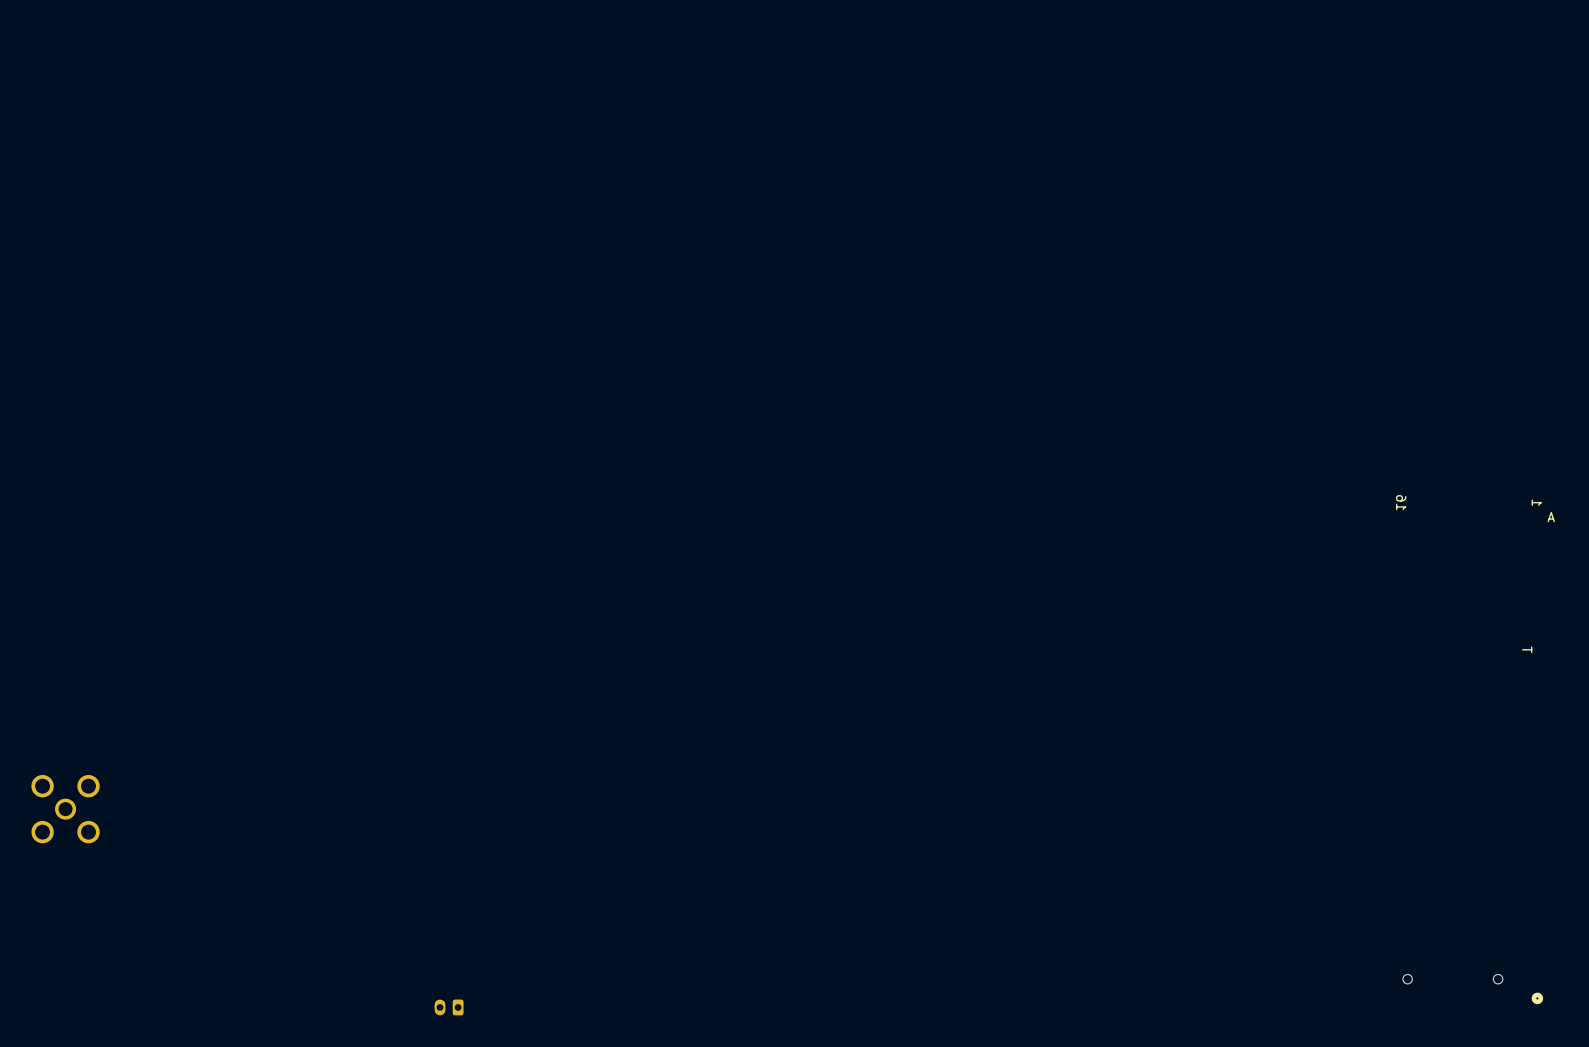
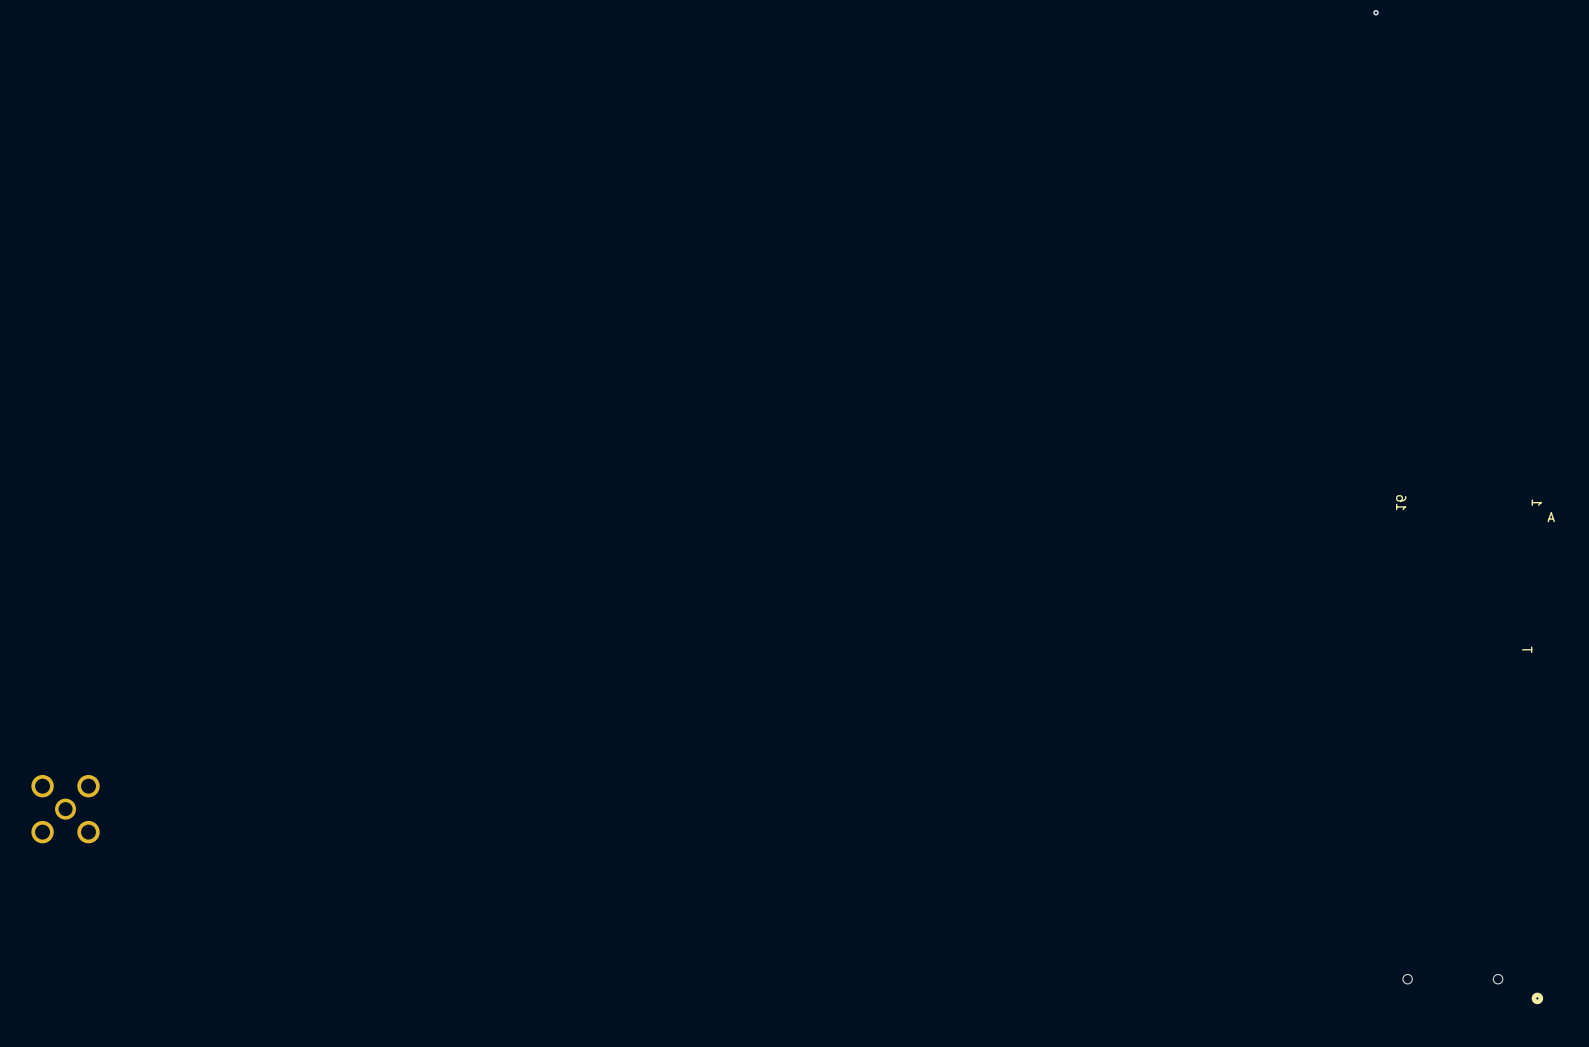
via: none -> (1375, 12)
part: (449, 1007) -> none

